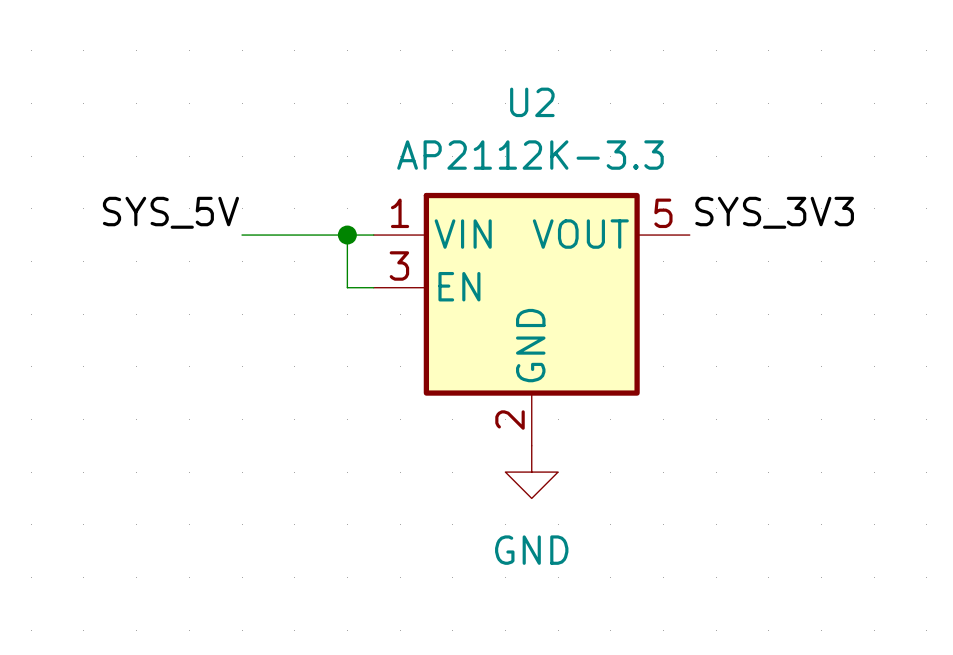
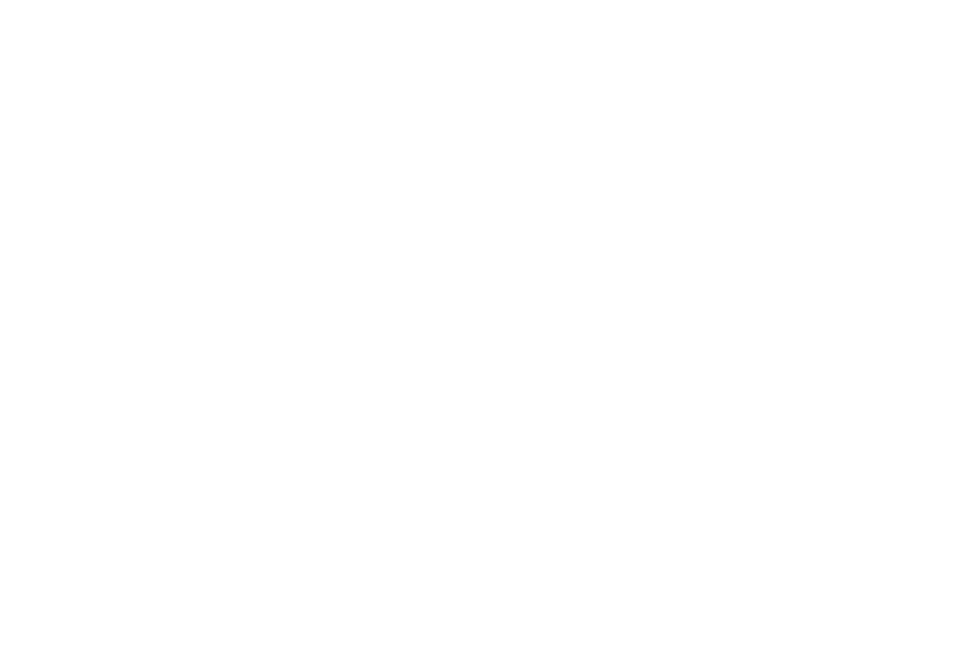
label: SYS_5V (170, 212) -> none
label: SYS_3V3 (774, 212) -> none
wire: (242, 235) (373, 235) -> none
wire: (347, 235) (347, 287) (373, 287) -> none
junction: (347, 235) -> none
U2: AP2112K-3.3 (531, 319) -> none
power symbol: GND (531, 472) -> none

